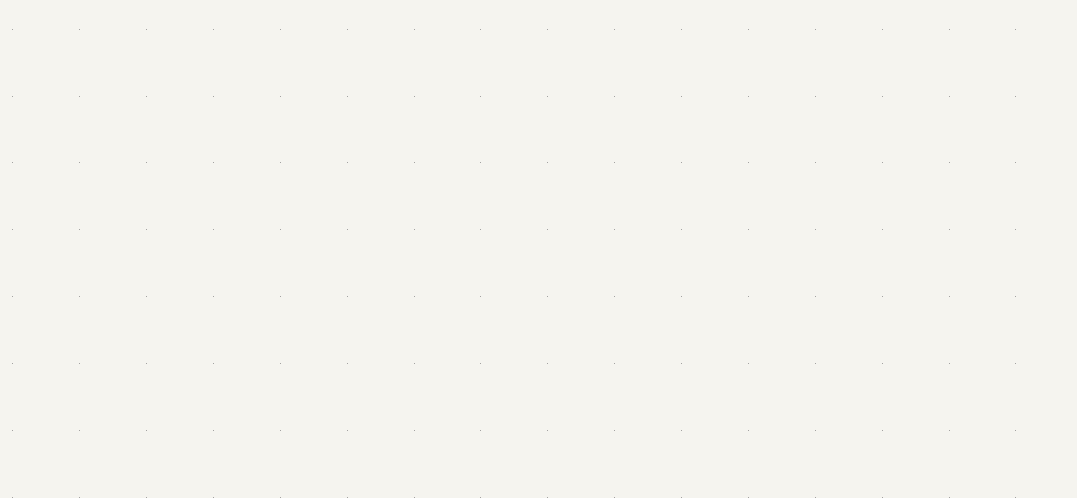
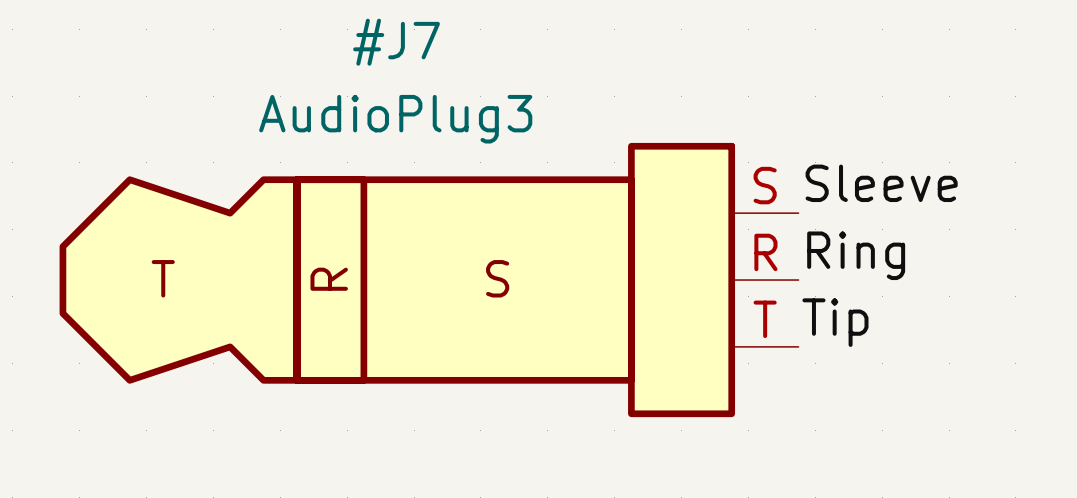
label: none -> Sleeve (881, 183)
label: none -> Ring (856, 255)
#J7: none -> AudioPlug3 (429, 280)
label: none -> Tip (835, 322)

